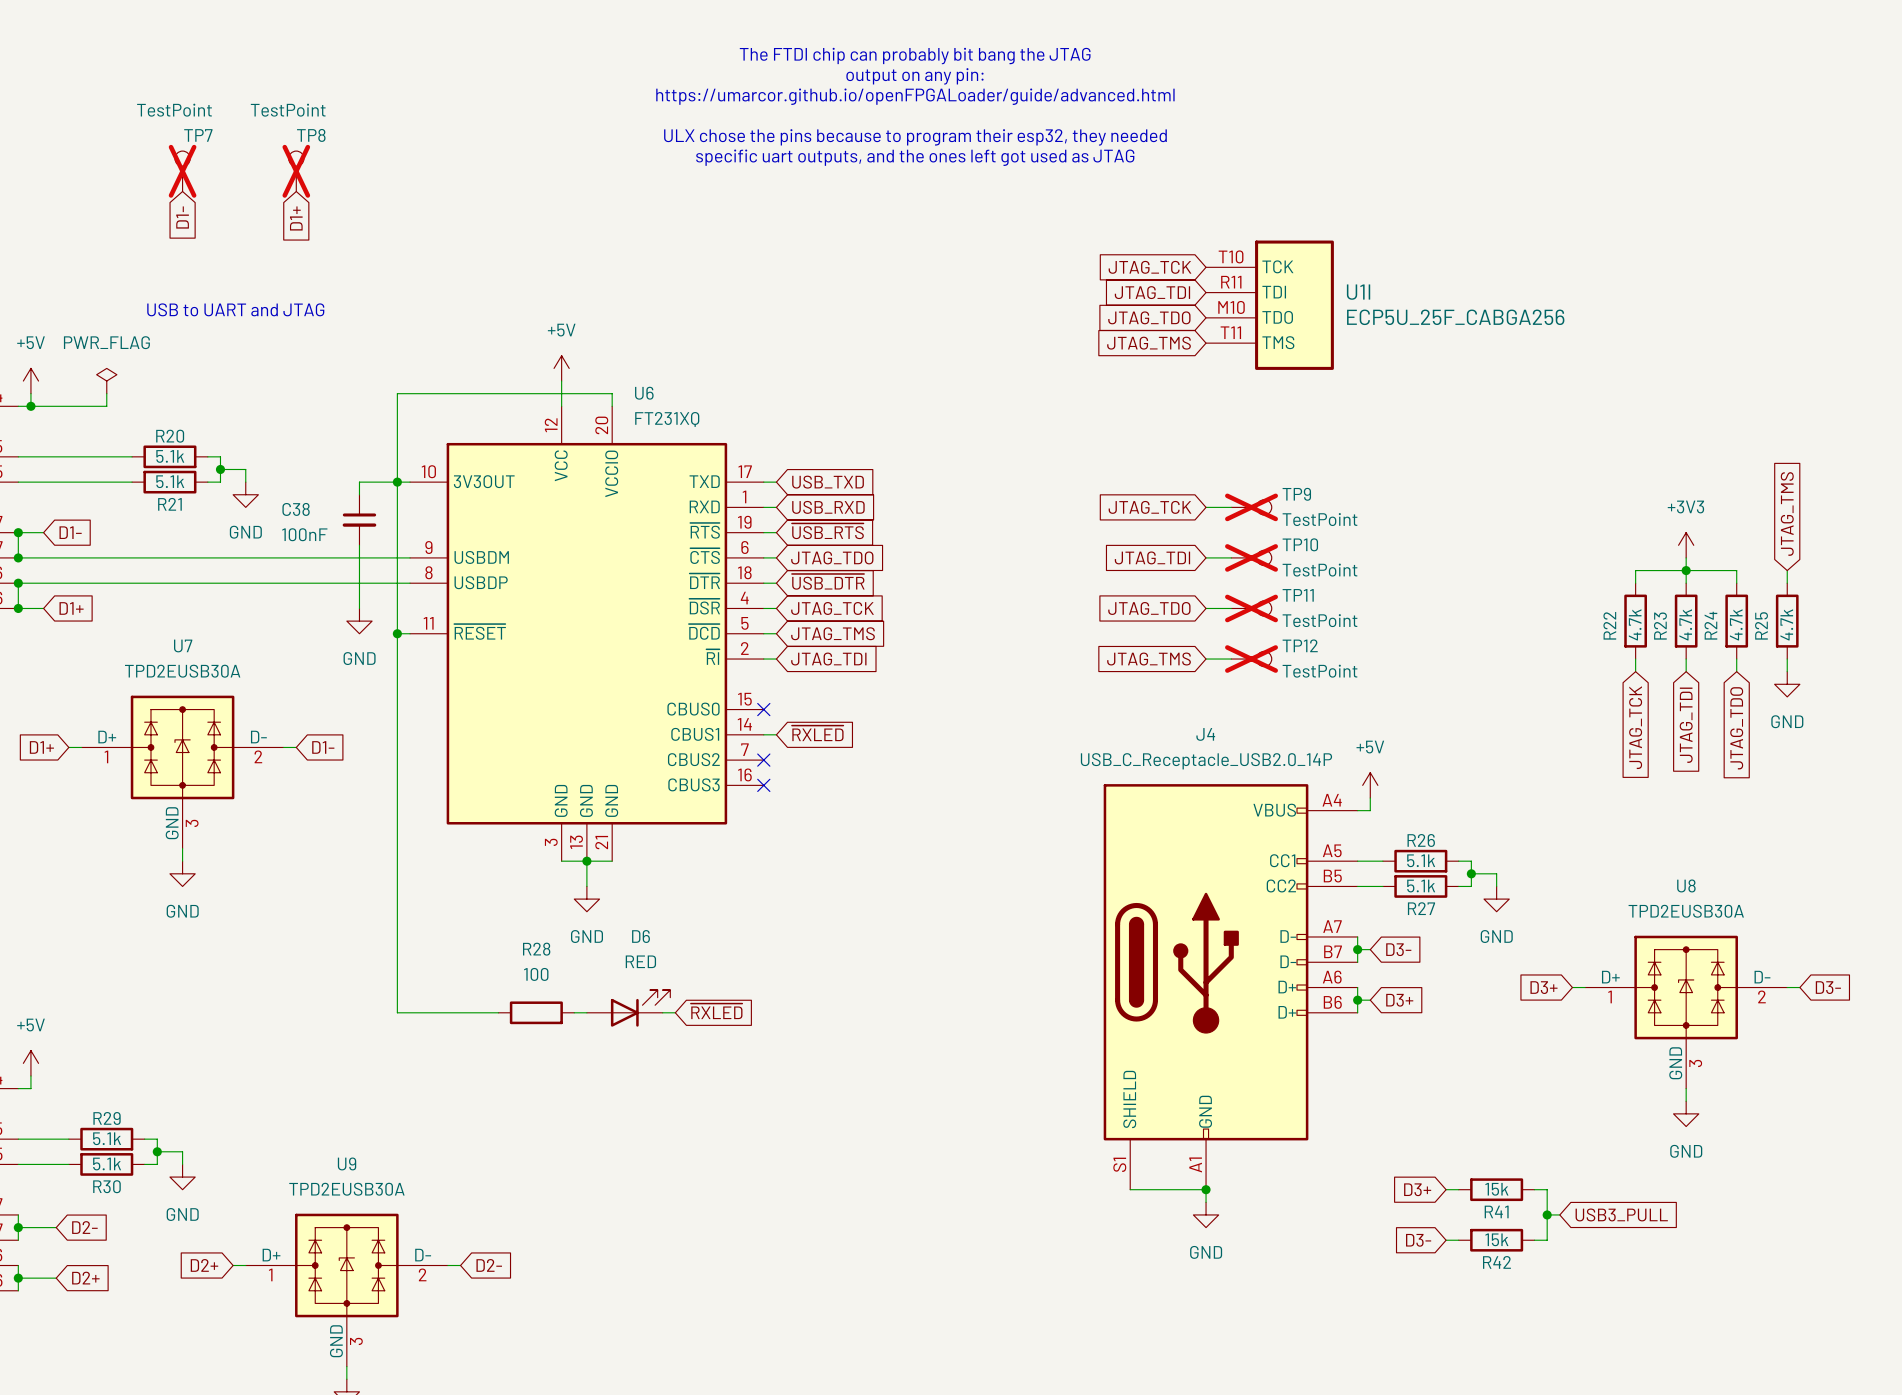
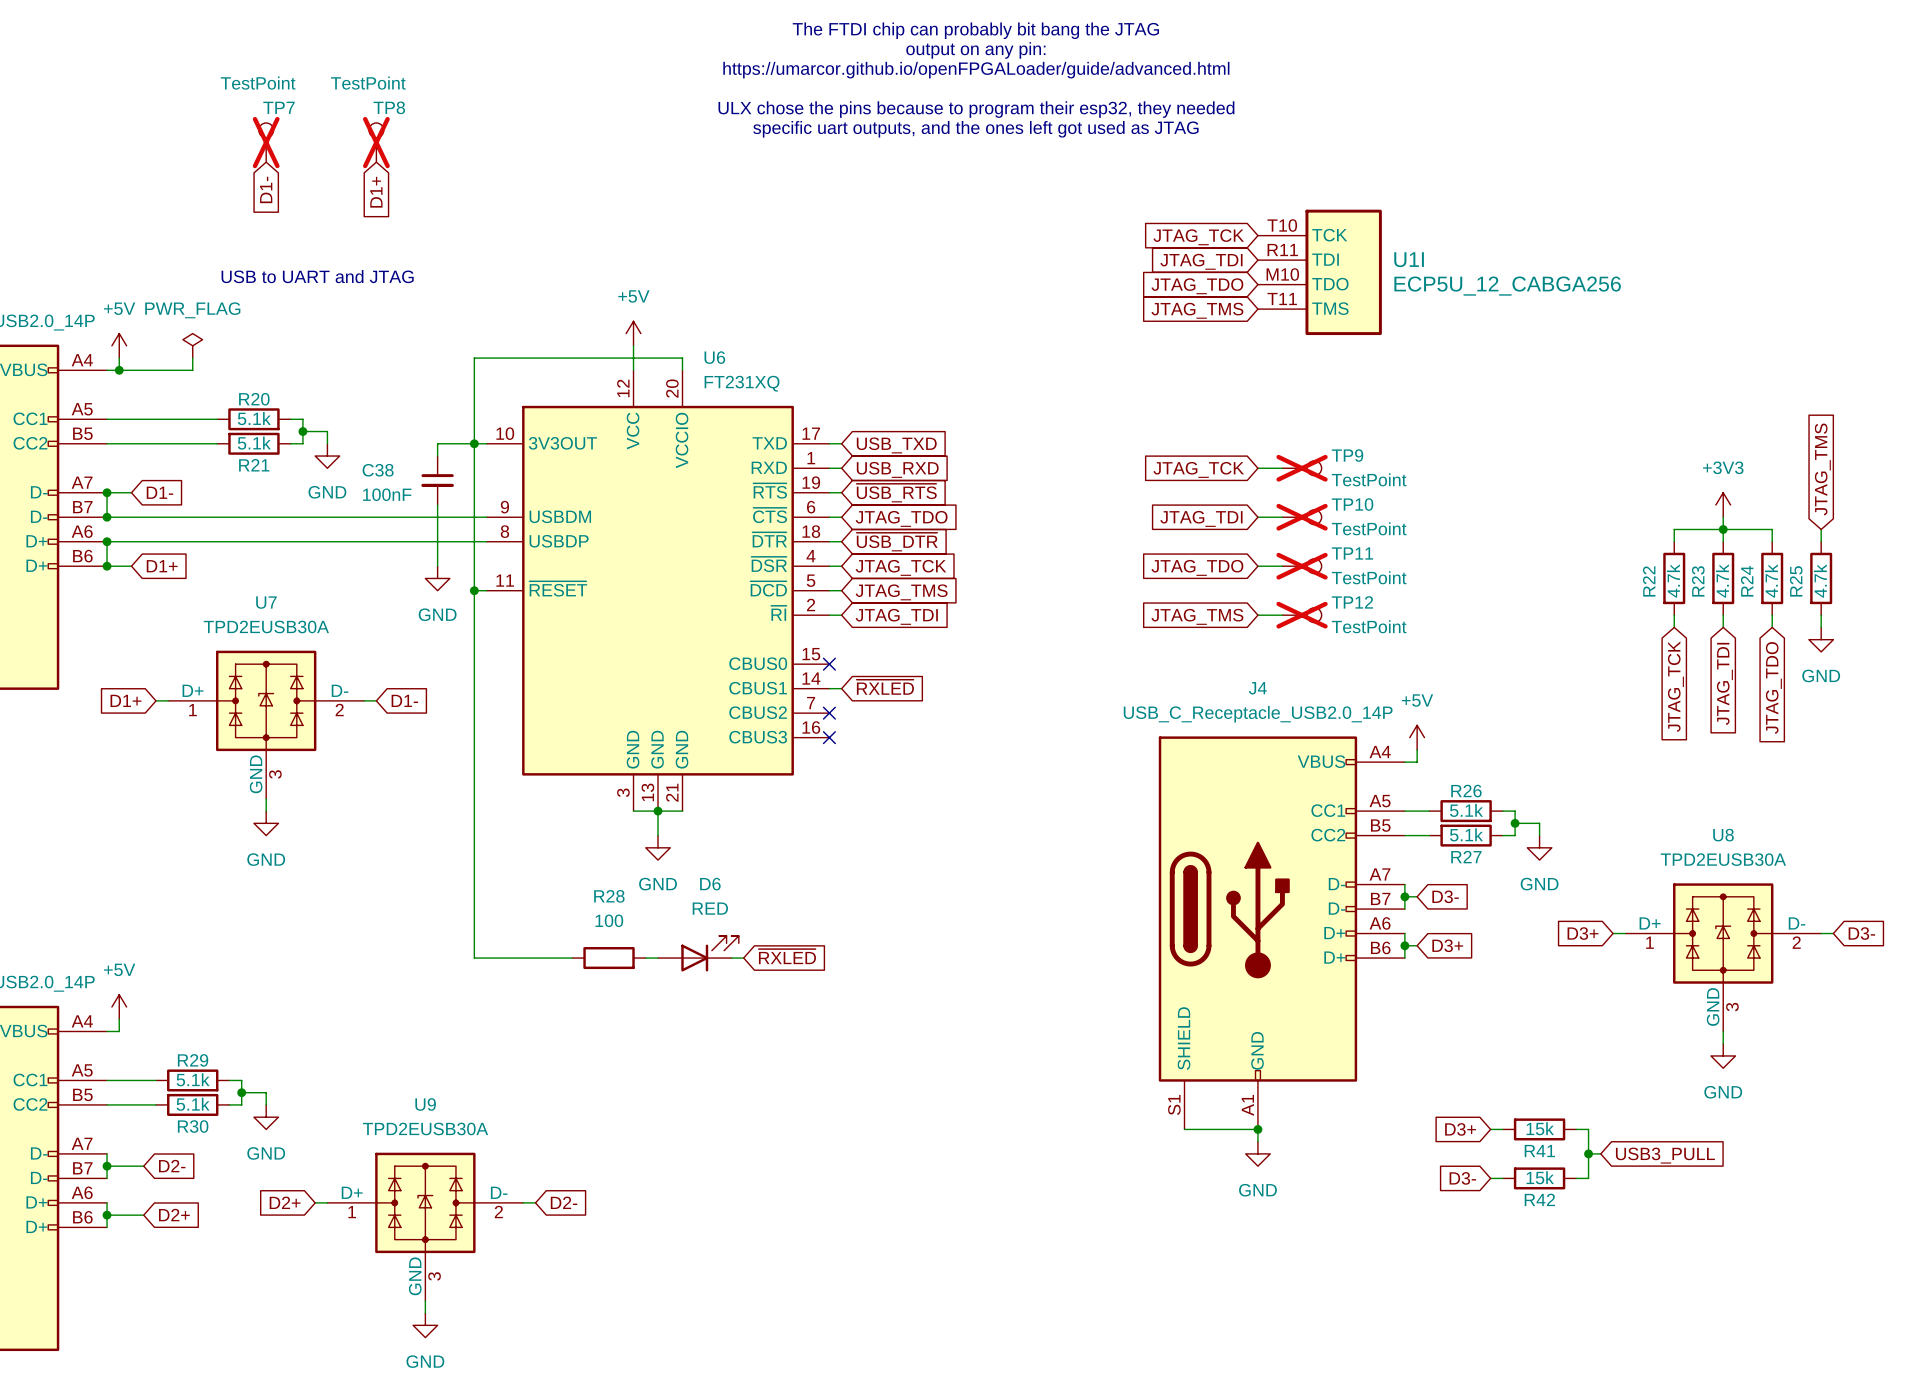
U1I value: ECP5U_25F_CABGA256 (1455, 317) -> ECP5U_12_CABGA256 (1507, 286)

